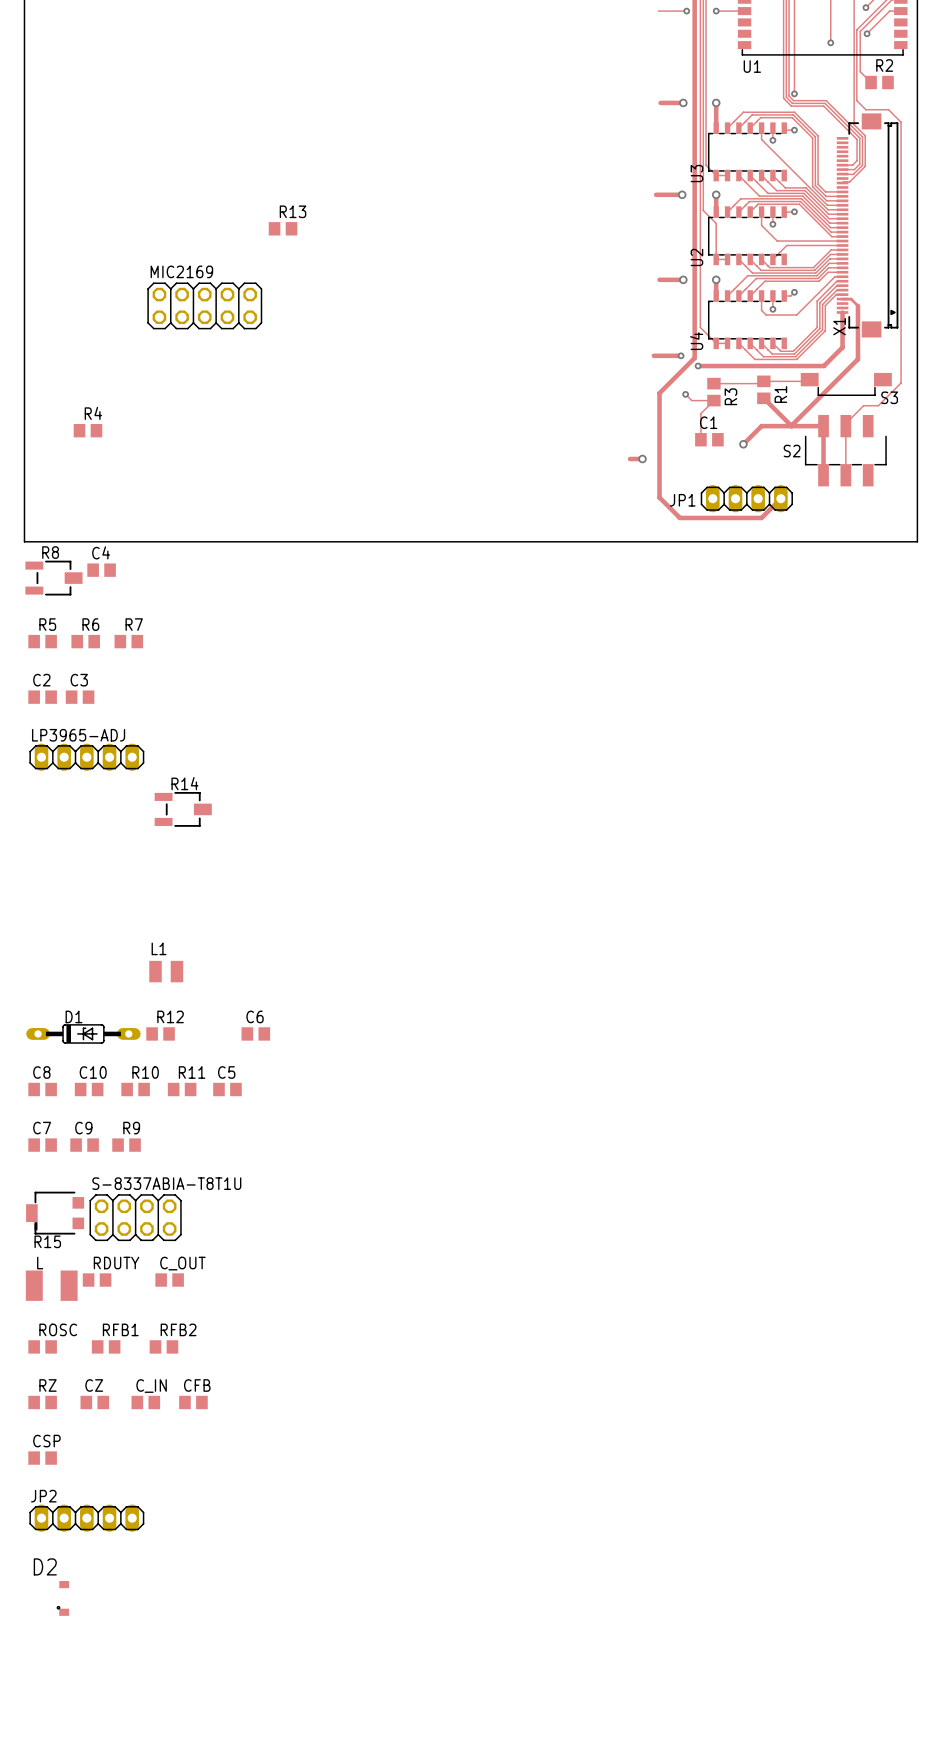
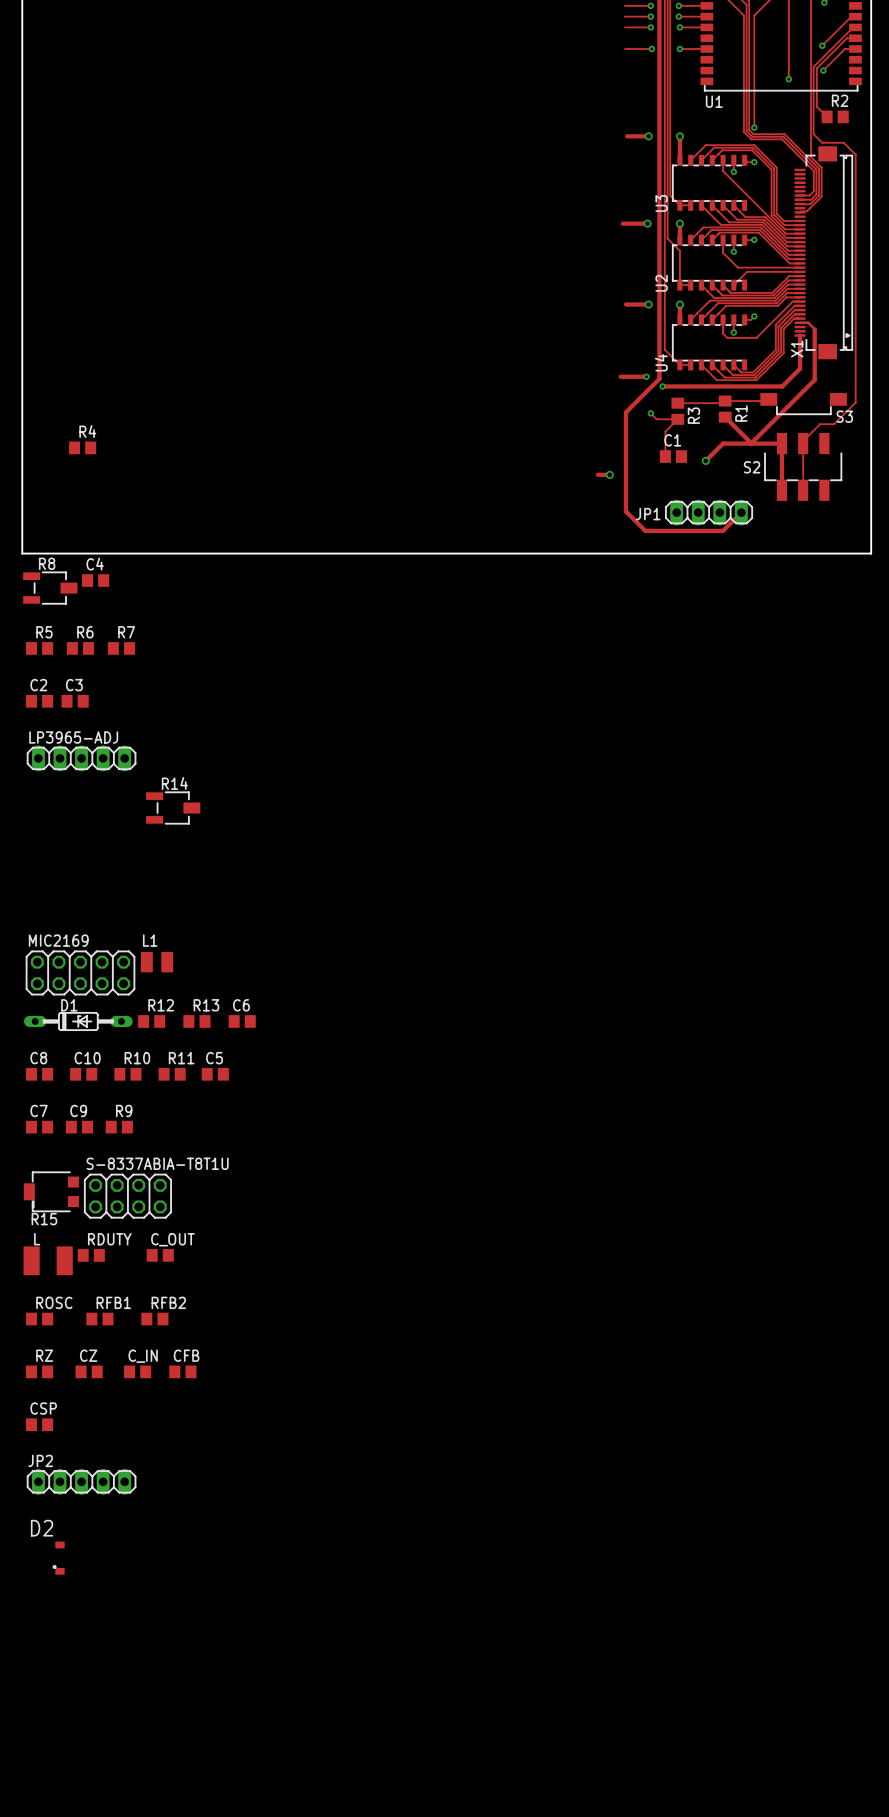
R13 position: (283, 228) -> (196, 1021)
MIC2169 position: (204, 305) -> (80, 972)

